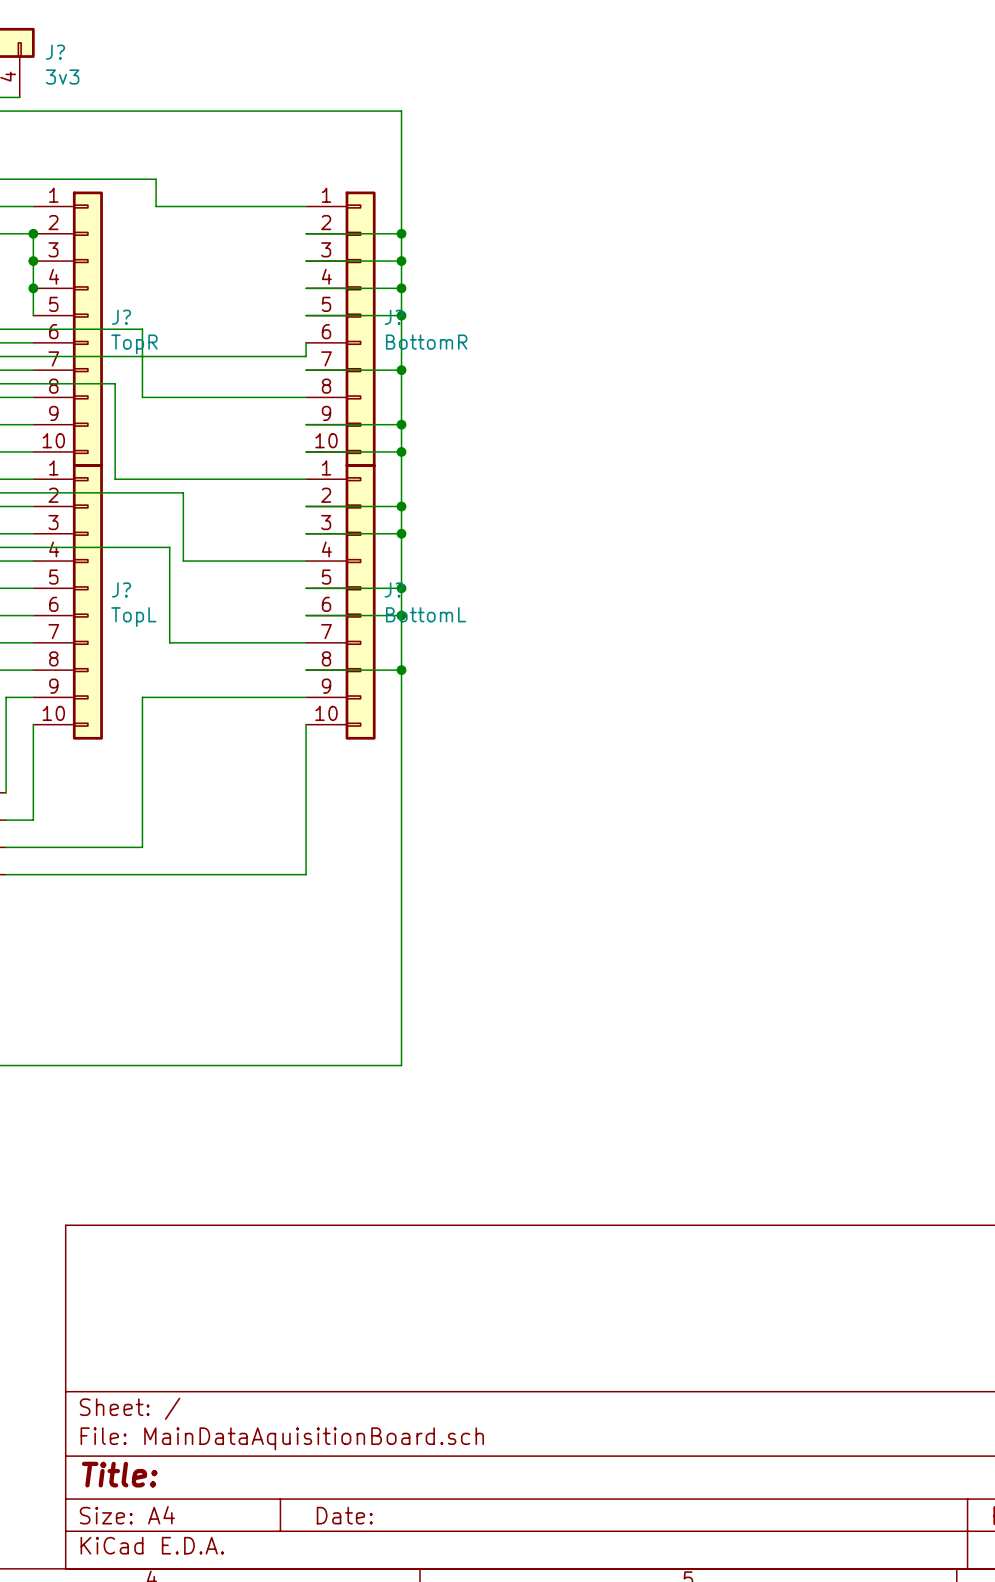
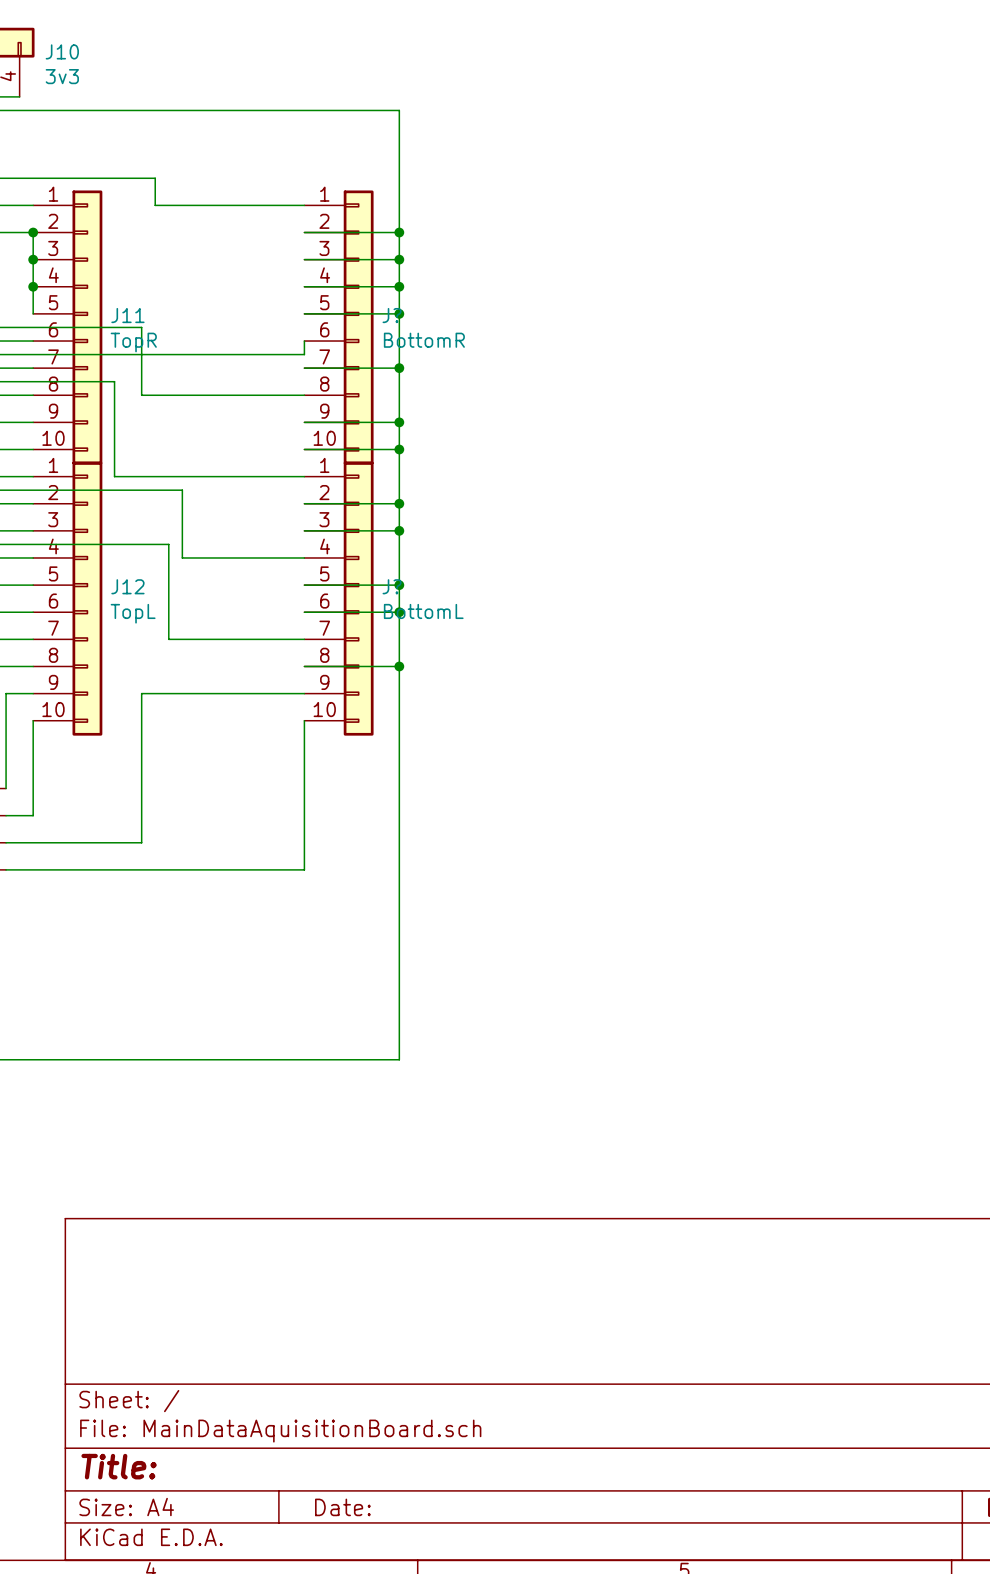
J? name: J? (55, 52) -> J10 (62, 51)
J? name: J? (121, 317) -> J11 (127, 315)
J? name: J? (121, 589) -> J12 (127, 586)

